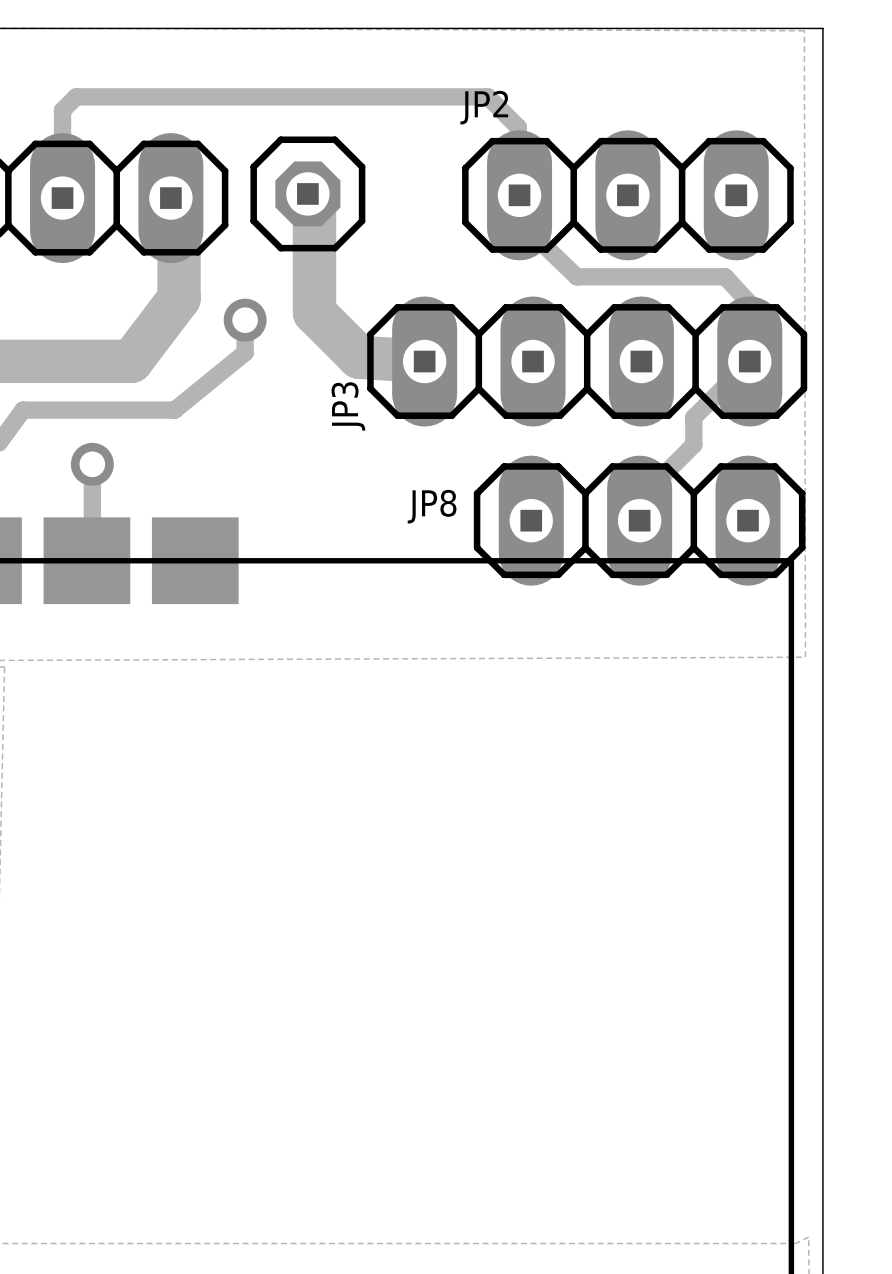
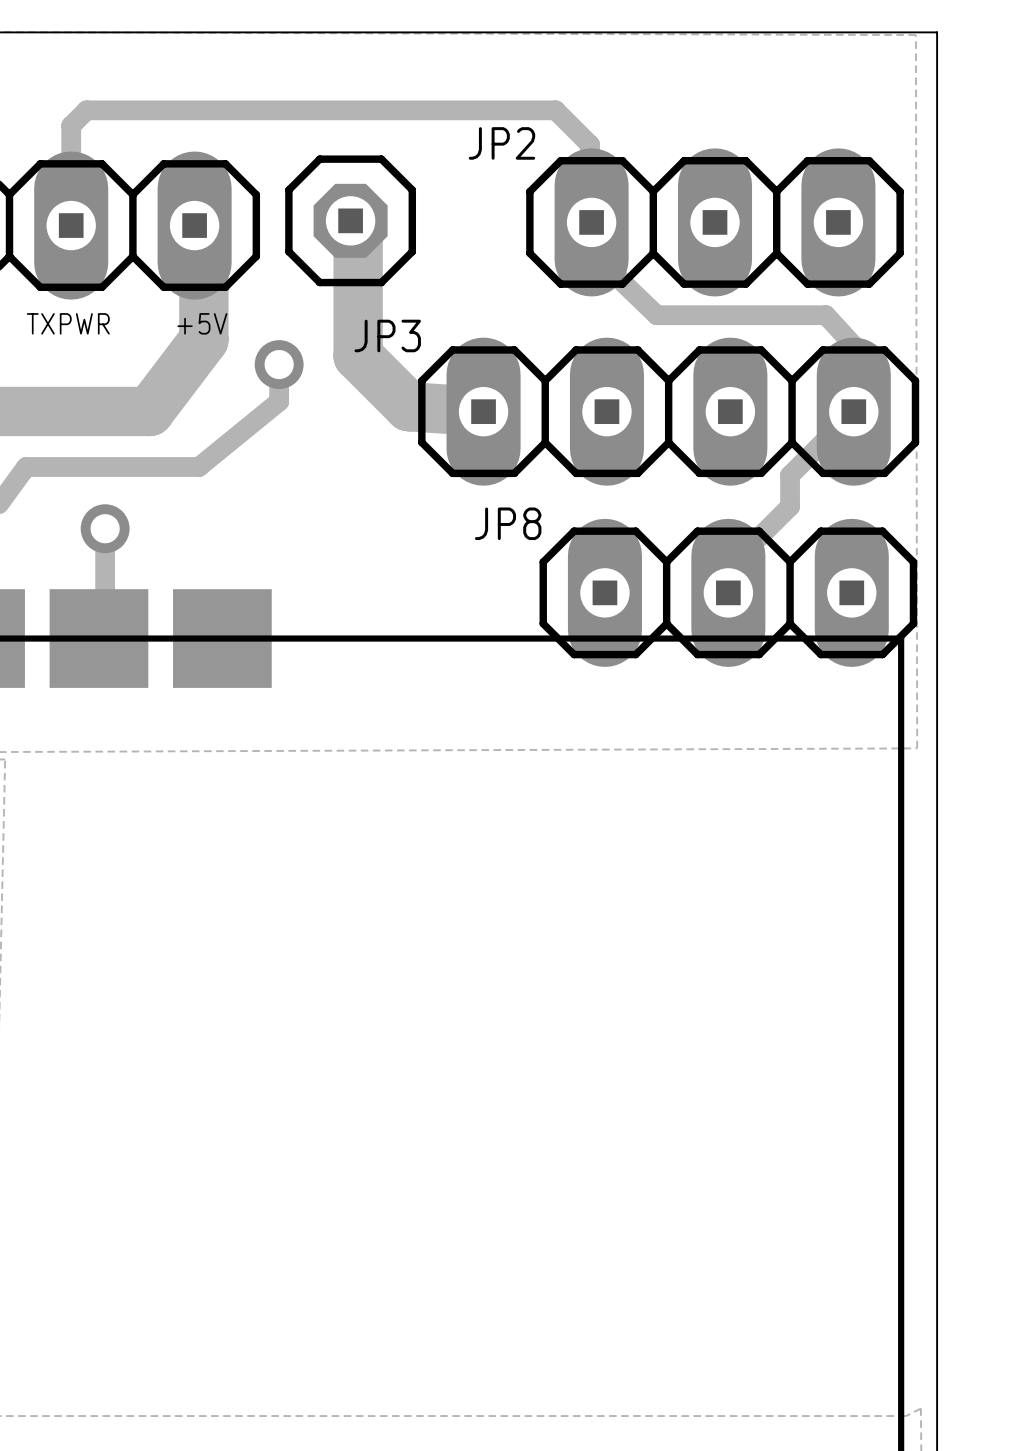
JP2 name position: JP2 (484, 107) -> JP2 (501, 143)
text: none -> TXPWR (68, 323)
text: none -> +5V (202, 323)
JP3 name rotation: 0° (348, 406) -> 90° clockwise (387, 335)
JP3 name position: JP3 (348, 406) -> JP3 (387, 335)
JP8 name position: JP8 (432, 506) -> JP8 (508, 523)

